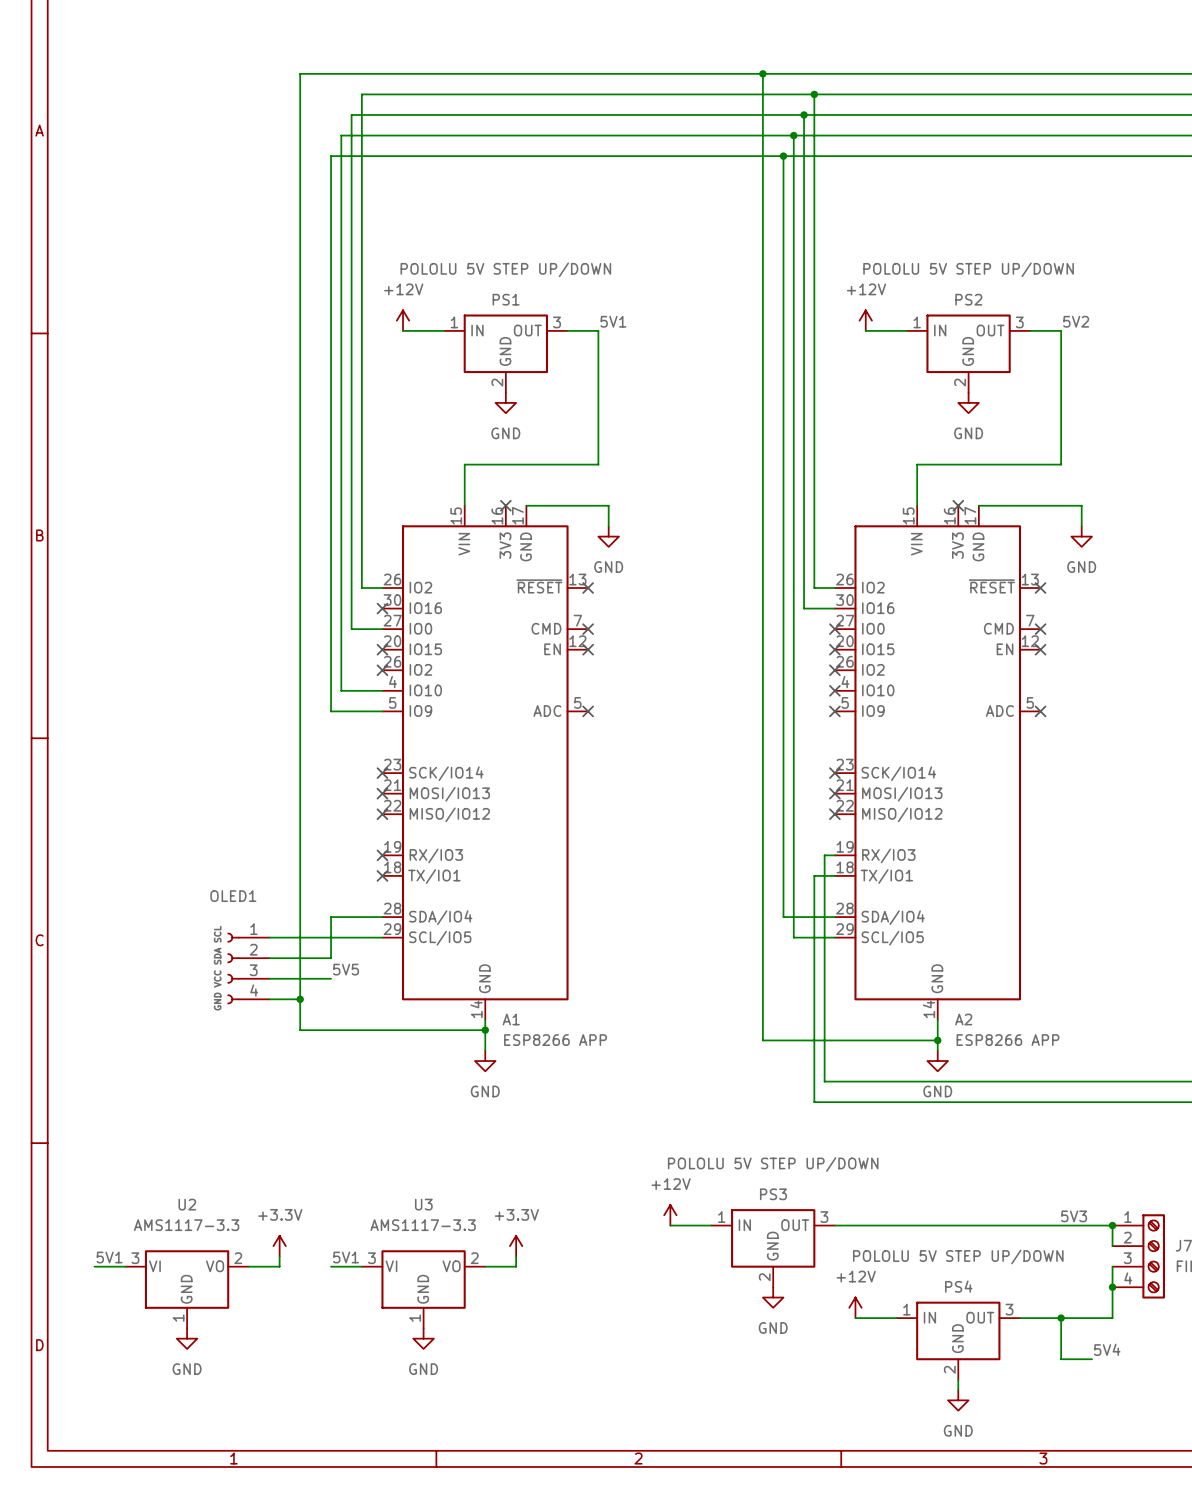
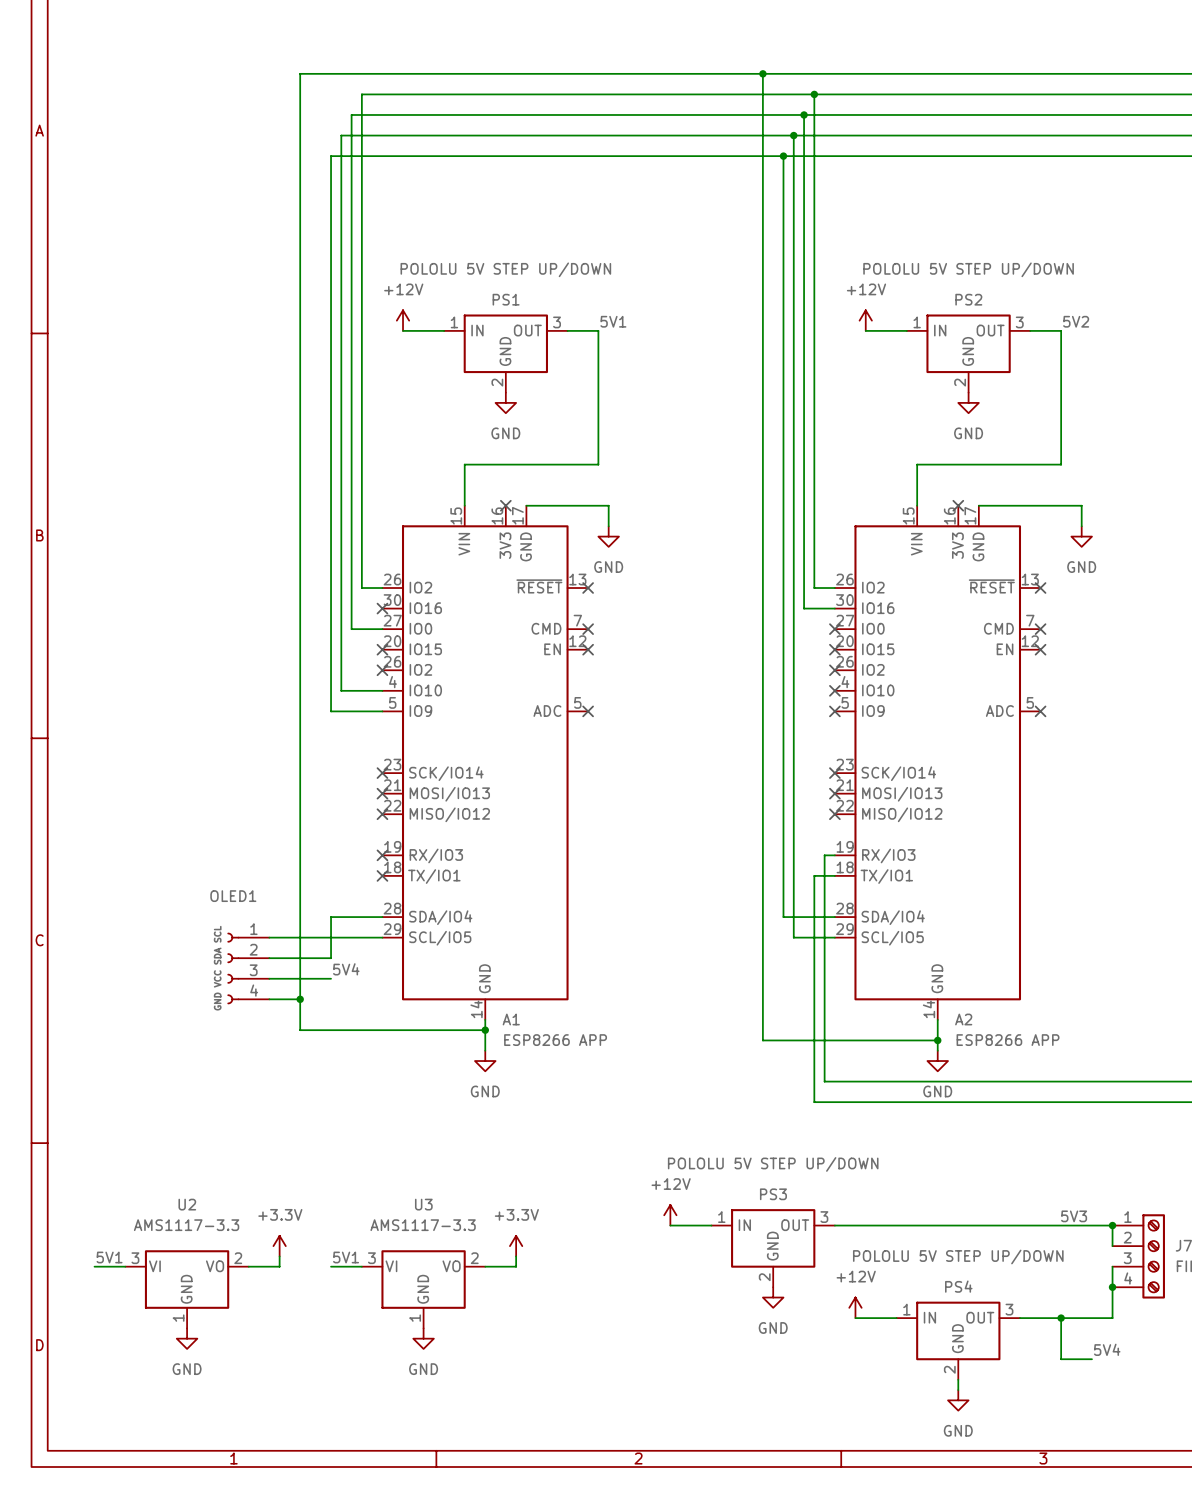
label: 5V5 (346, 969) -> 5V4 (346, 969)

